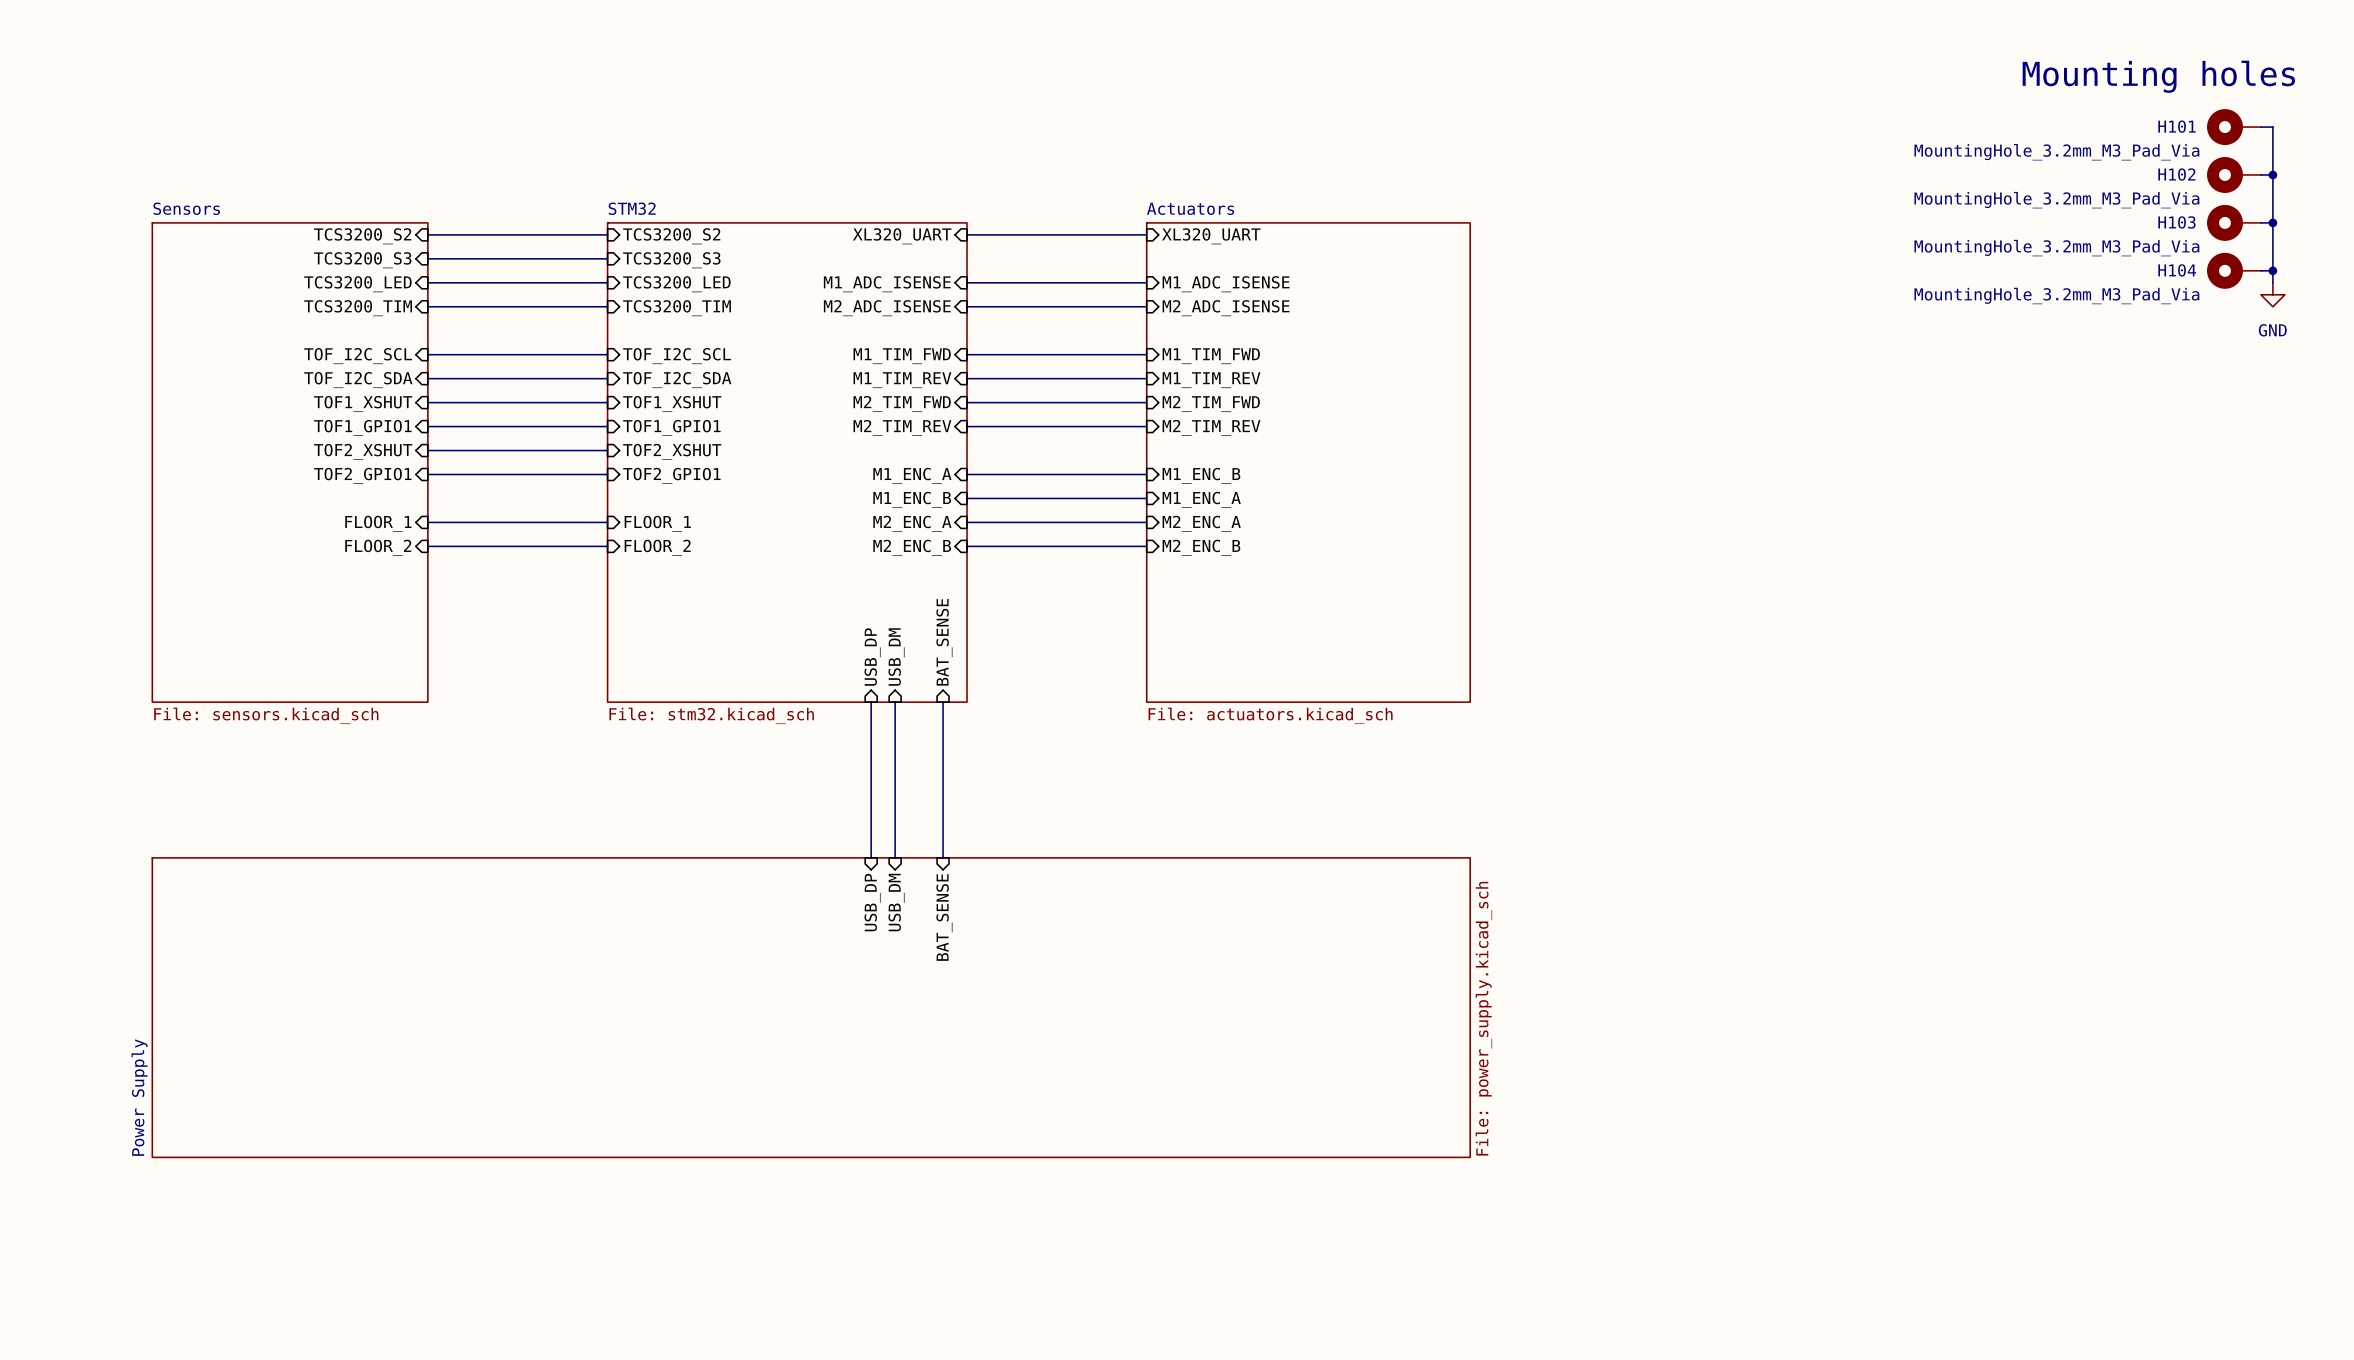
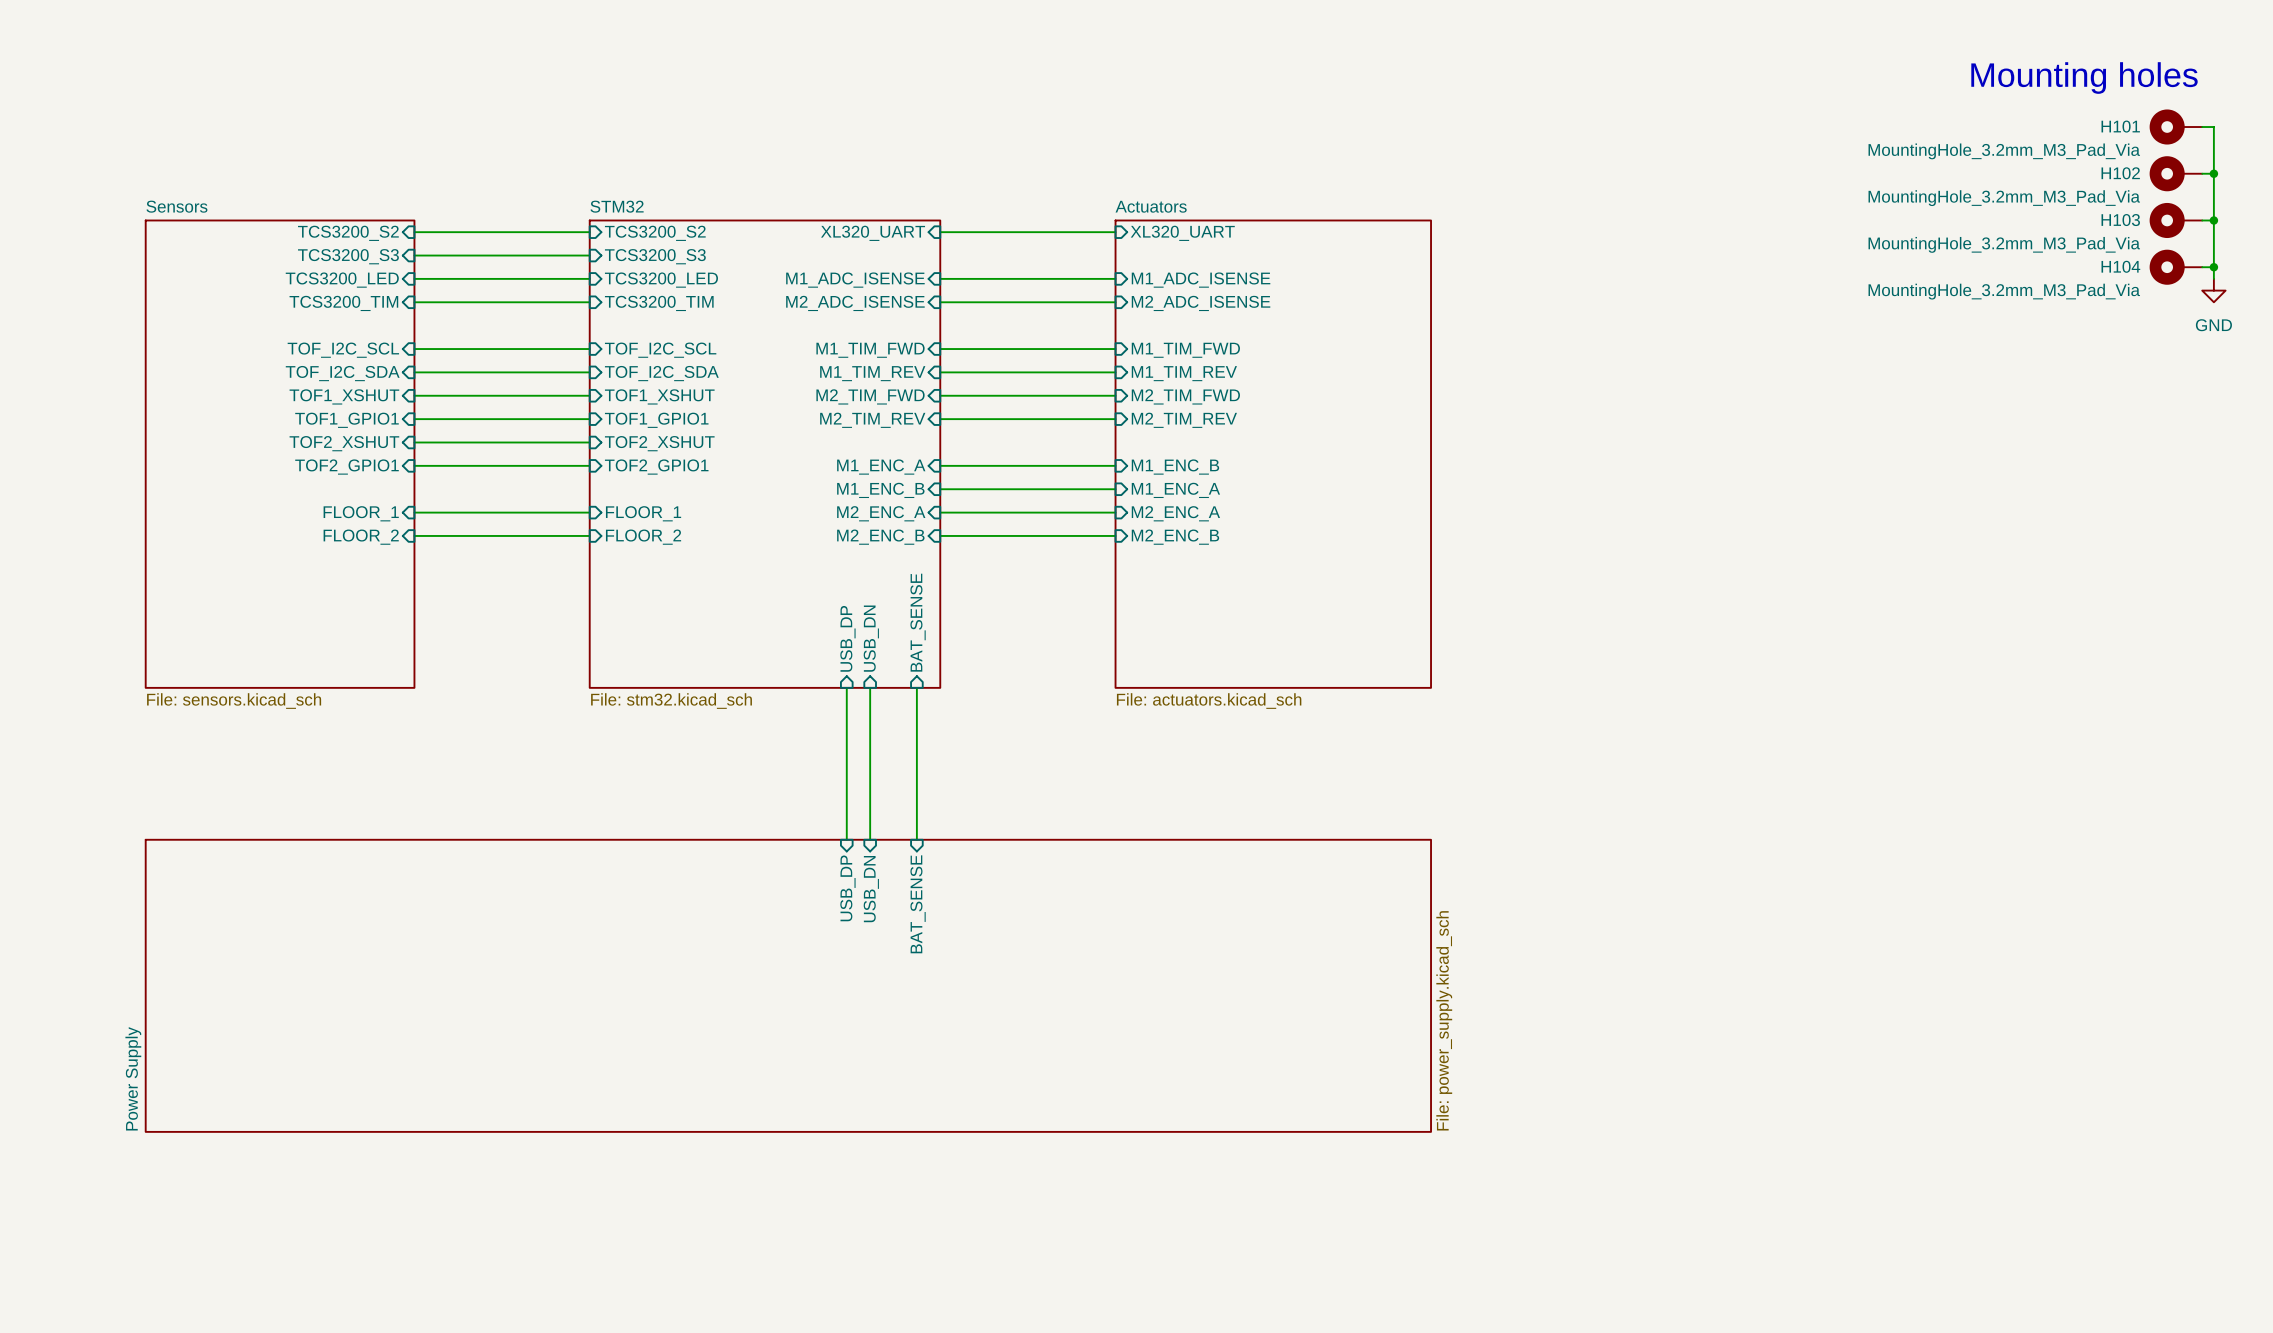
sheet pin: USB_DM (896, 657) -> USB_DN (871, 638)
sheet pin: USB_DM (896, 902) -> USB_DN (871, 889)

